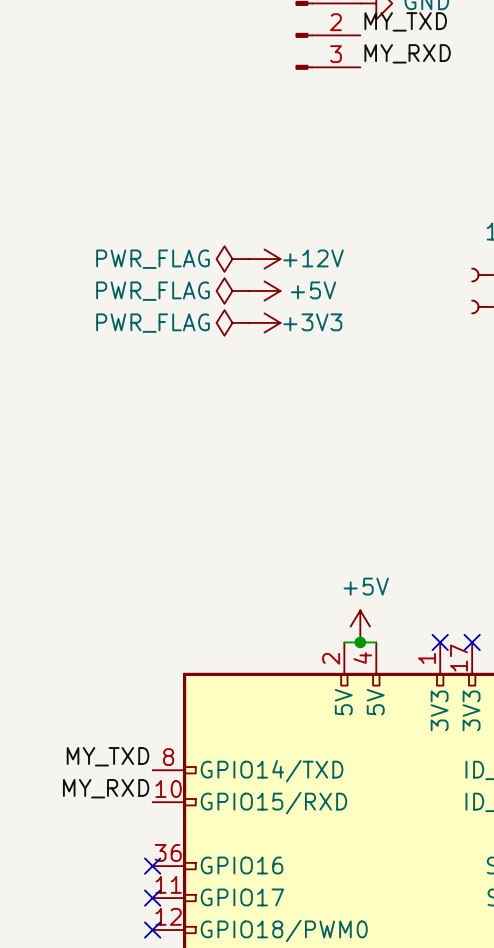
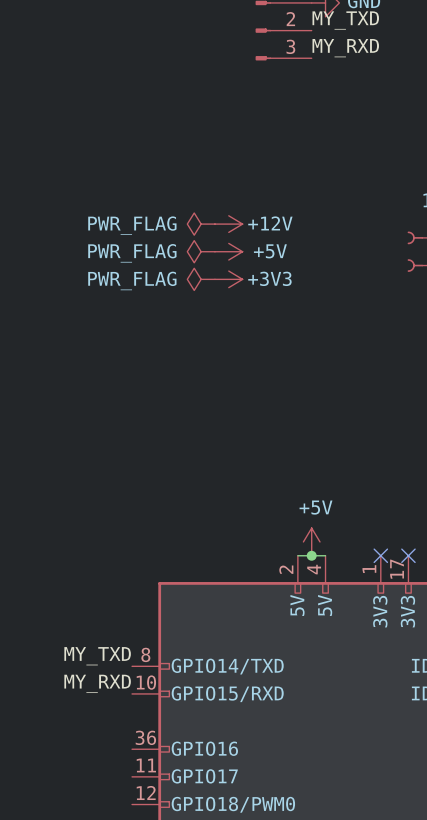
no-connect mark: (152, 866) -> none
no-connect mark: (152, 898) -> none
no-connect mark: (152, 930) -> none

